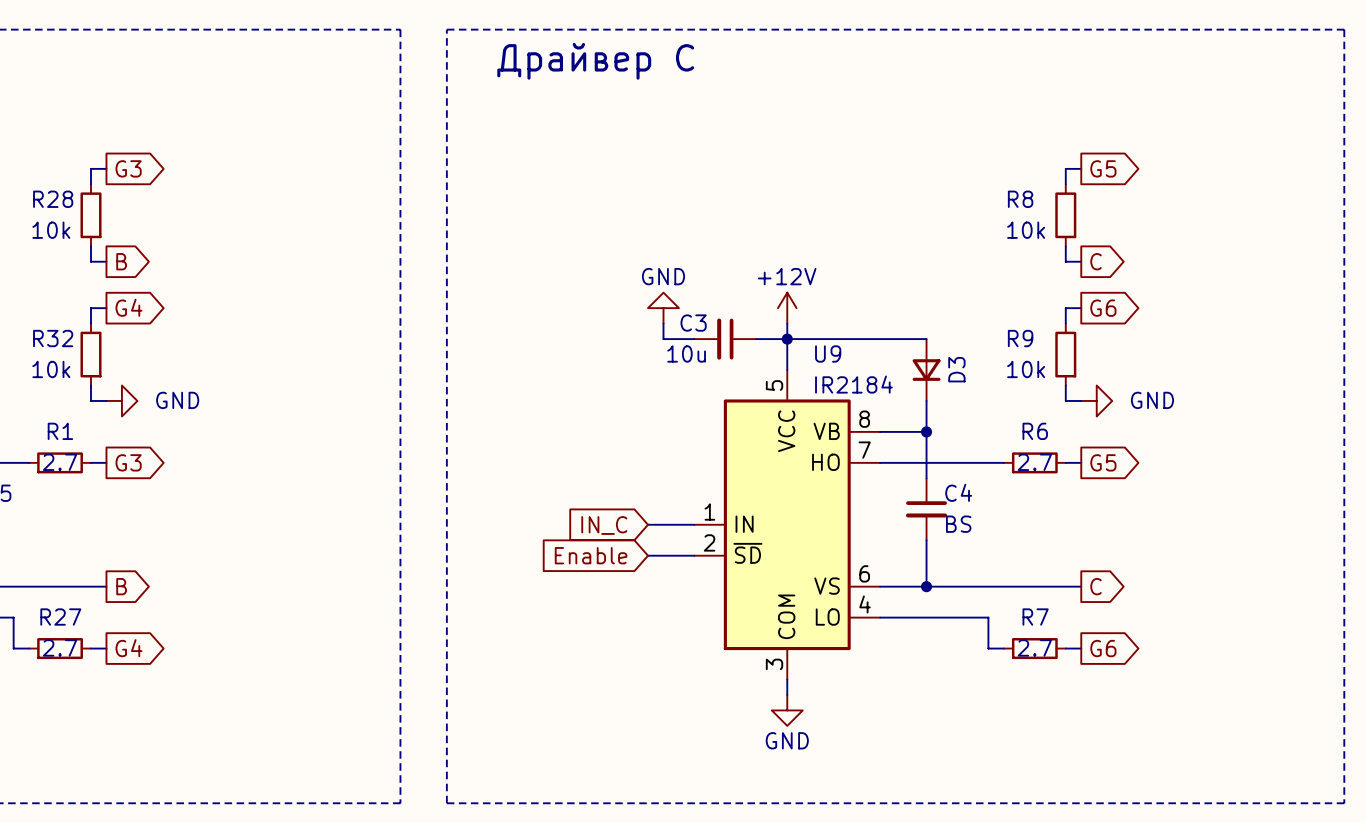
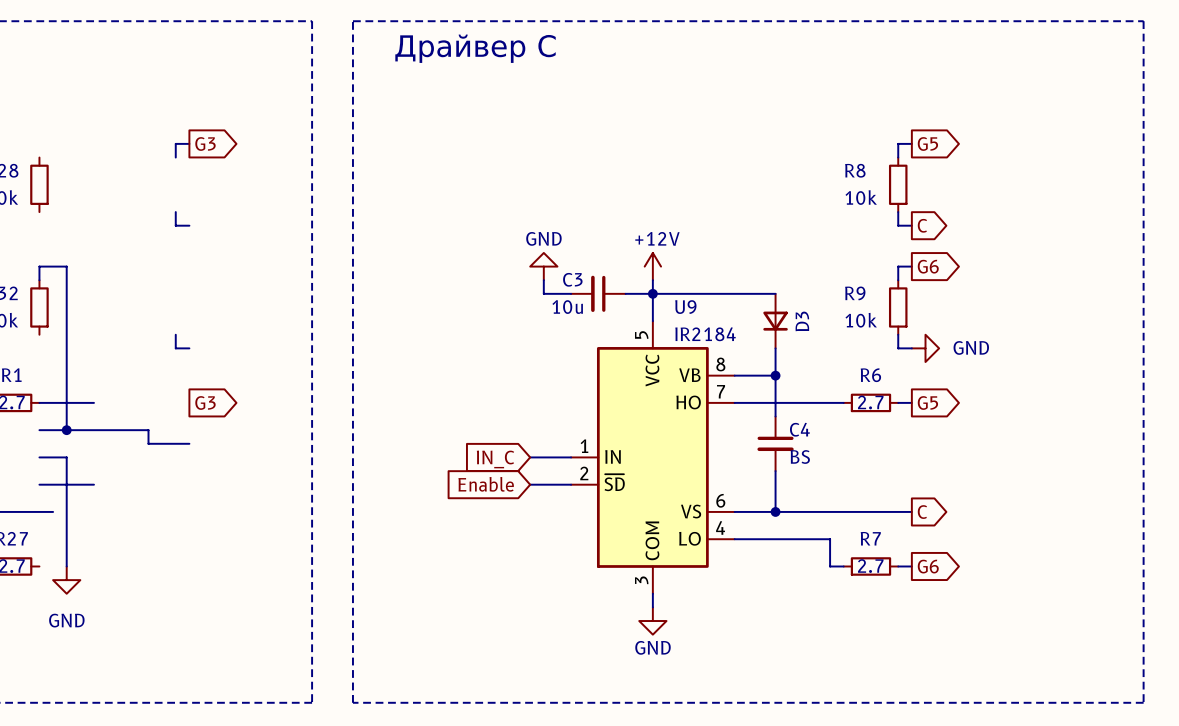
wire: (106, 168) (91, 168) (91, 184) -> (189, 143) (175, 143) (175, 157)
global label position: G3 (128, 168) -> G3 (205, 143)
wire: (91, 246) (91, 261) (106, 261) -> (175, 212) (175, 225) (189, 225)
global label: B (121, 261) -> none
global label: G4 (128, 307) -> none
wire: none -> (53, 266) (66, 266) (66, 430)
wire: (91, 385) (91, 400) (106, 400) -> (175, 334) (175, 348) (189, 348)
power symbol: GND (121, 400) -> none
wire: none -> (53, 402) (93, 402)
global label position: G3 (128, 462) -> G3 (205, 402)
wire: none -> (39, 430) (148, 430) (148, 443) (189, 443)
junction: none -> (66, 430)
wire: none -> (39, 457) (66, 457) (66, 566)
wire: none -> (39, 484) (93, 484)
global label: B (121, 586) -> none
wire: (91, 648) (106, 648) -> none
global label: G4 (128, 648) -> none
power symbol: none -> GND (66, 580)

